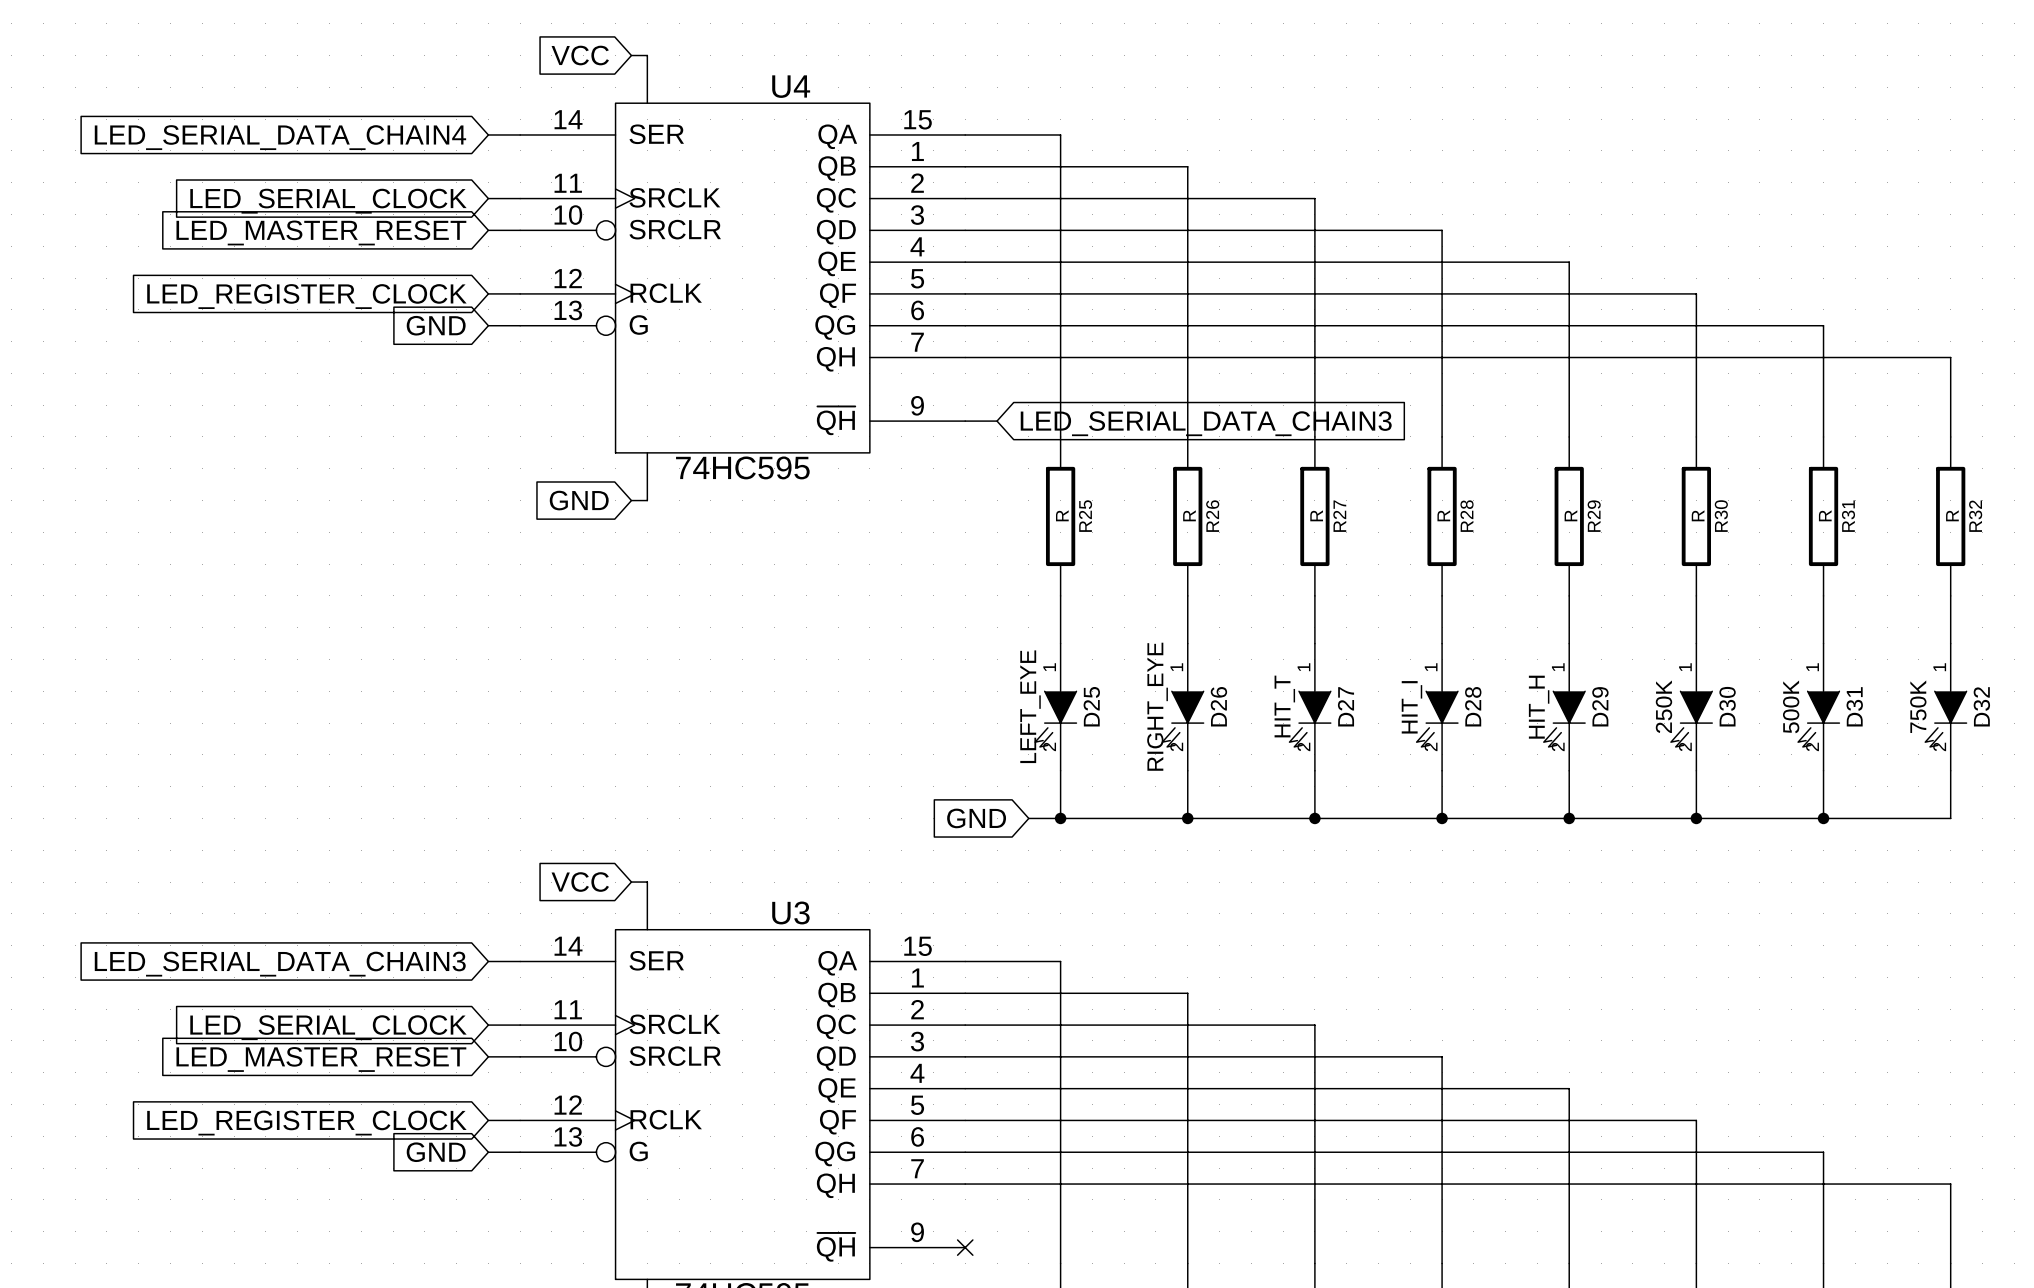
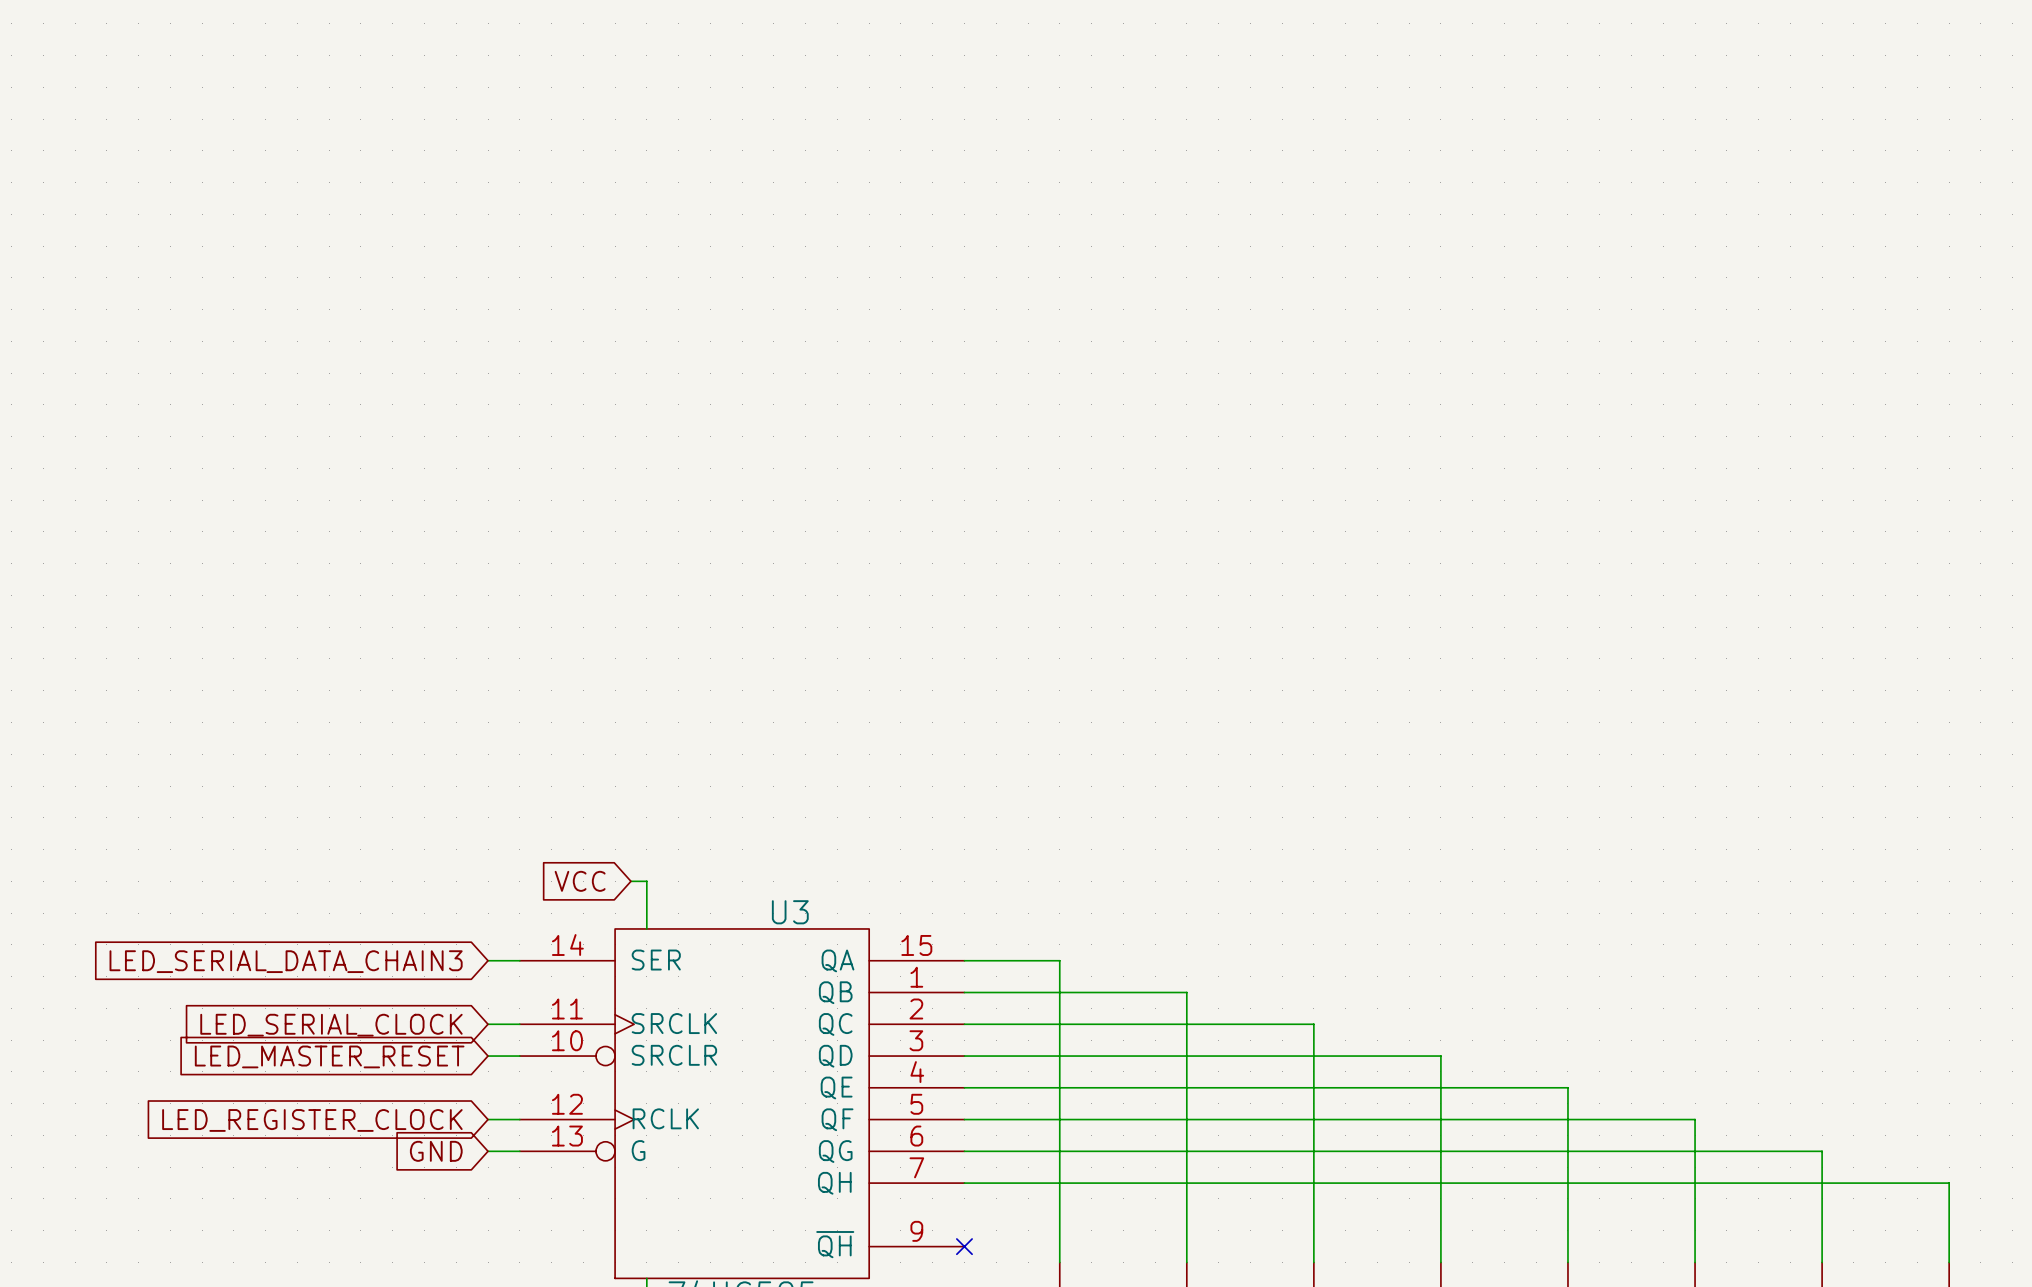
global label: VCC (580, 55) -> none
wire: (631, 55) (647, 55) (647, 103) -> none
wire: (488, 134) (520, 134) -> none
wire: (965, 134) (1060, 134) (1060, 436) -> none
global label: LED_SERIAL_DATA_CHAIN4 (280, 137) -> none
wire: (965, 166) (1187, 166) (1187, 436) -> none
wire: (488, 198) (520, 198) -> none
wire: (965, 198) (1314, 198) (1314, 436) -> none
global label: LED_SERIAL_CLOCK (328, 201) -> none
wire: (488, 230) (520, 230) -> none
wire: (965, 230) (1442, 230) (1442, 436) -> none
global label: LED_MASTER_RESET (321, 232) -> none
wire: (965, 262) (1569, 262) (1569, 436) -> none
U4: 74HC595 (742, 278) -> none
wire: (488, 293) (520, 293) -> none
wire: (965, 293) (1696, 293) (1696, 436) -> none
global label: LED_REGISTER_CLOCK (306, 296) -> none
global label: GND (436, 325) -> none
wire: (488, 325) (520, 325) -> none
wire: (965, 325) (1823, 325) (1823, 436) -> none
wire: (965, 357) (1950, 357) (1950, 436) -> none
wire: (965, 421) (997, 421) -> none
global label: LED_SERIAL_DATA_CHAIN3 (1206, 423) -> none
wire: (647, 452) (647, 500) (631, 500) -> none
global label: GND (579, 500) -> none
R25: R (1060, 516) -> none
R26: R (1187, 516) -> none
R27: R (1314, 516) -> none
R28: R (1442, 516) -> none
R29: R (1569, 516) -> none
R30: R (1696, 516) -> none
R31: R (1823, 516) -> none
R32: R (1950, 516) -> none
wire: (1060, 595) (1060, 643) -> none
wire: (1187, 595) (1187, 643) -> none
wire: (1314, 595) (1314, 643) -> none
wire: (1442, 595) (1442, 643) -> none
wire: (1569, 595) (1569, 643) -> none
wire: (1696, 595) (1696, 643) -> none
wire: (1823, 595) (1823, 643) -> none
wire: (1950, 595) (1950, 643) -> none
D25: LEFT_EYE (1055, 707) -> none
D26: RIGHT_EYE (1182, 707) -> none
D27: HIT_T (1310, 707) -> none
D28: HIT_I (1437, 707) -> none
D29: HIT_H (1564, 707) -> none
D30: 250K (1691, 707) -> none
D31: 500K (1818, 707) -> none
D32: 750K (1945, 707) -> none
wire: (1060, 770) (1060, 818) -> none
wire: (1187, 770) (1187, 818) -> none
wire: (1314, 770) (1314, 818) -> none
wire: (1442, 770) (1442, 818) -> none
wire: (1569, 770) (1569, 818) -> none
wire: (1696, 770) (1696, 818) -> none
wire: (1823, 770) (1823, 818) -> none
wire: (1950, 770) (1950, 818) (1028, 818) -> none
global label: GND (976, 818) -> none
junction: (1060, 818) -> none
junction: (1187, 818) -> none
junction: (1314, 818) -> none
junction: (1442, 818) -> none
junction: (1569, 818) -> none
junction: (1696, 818) -> none
junction: (1823, 818) -> none

